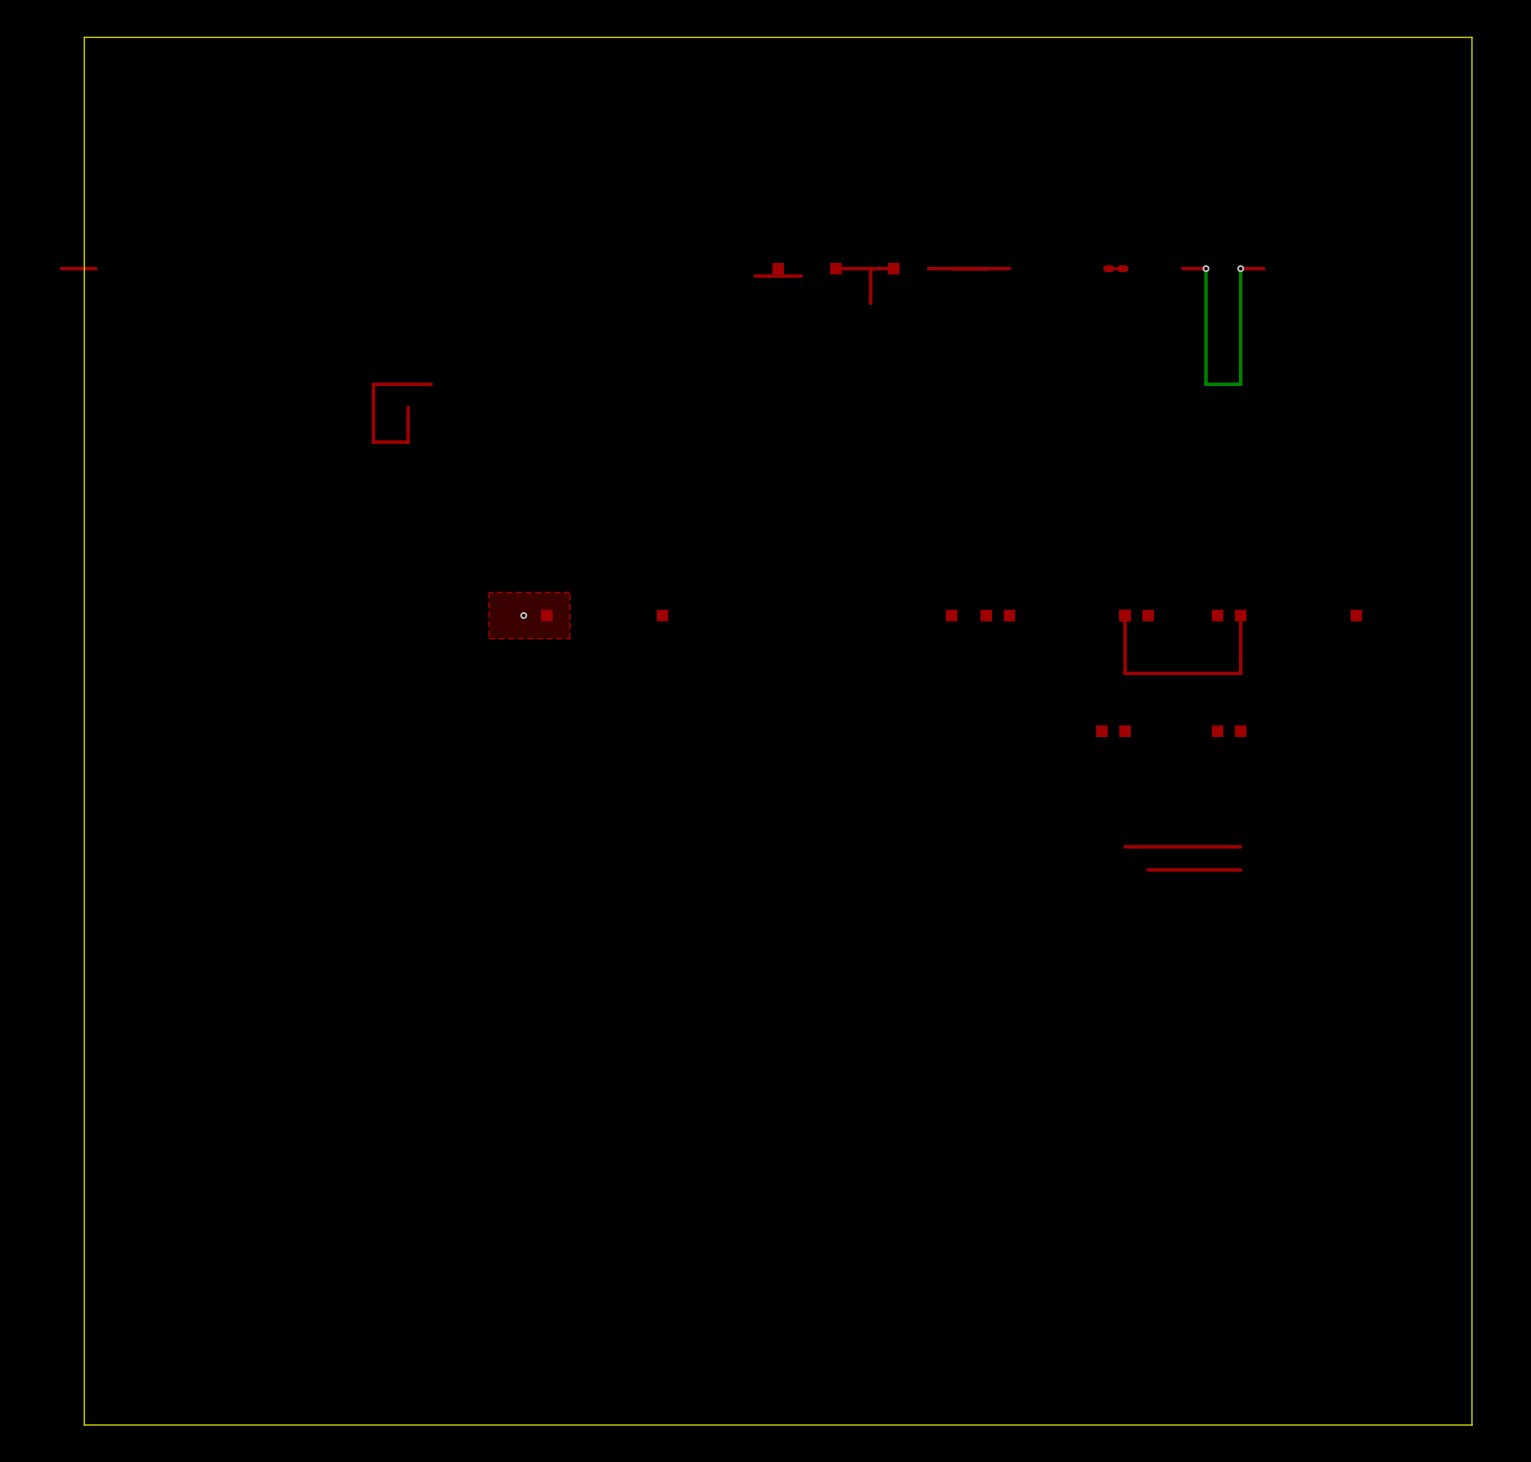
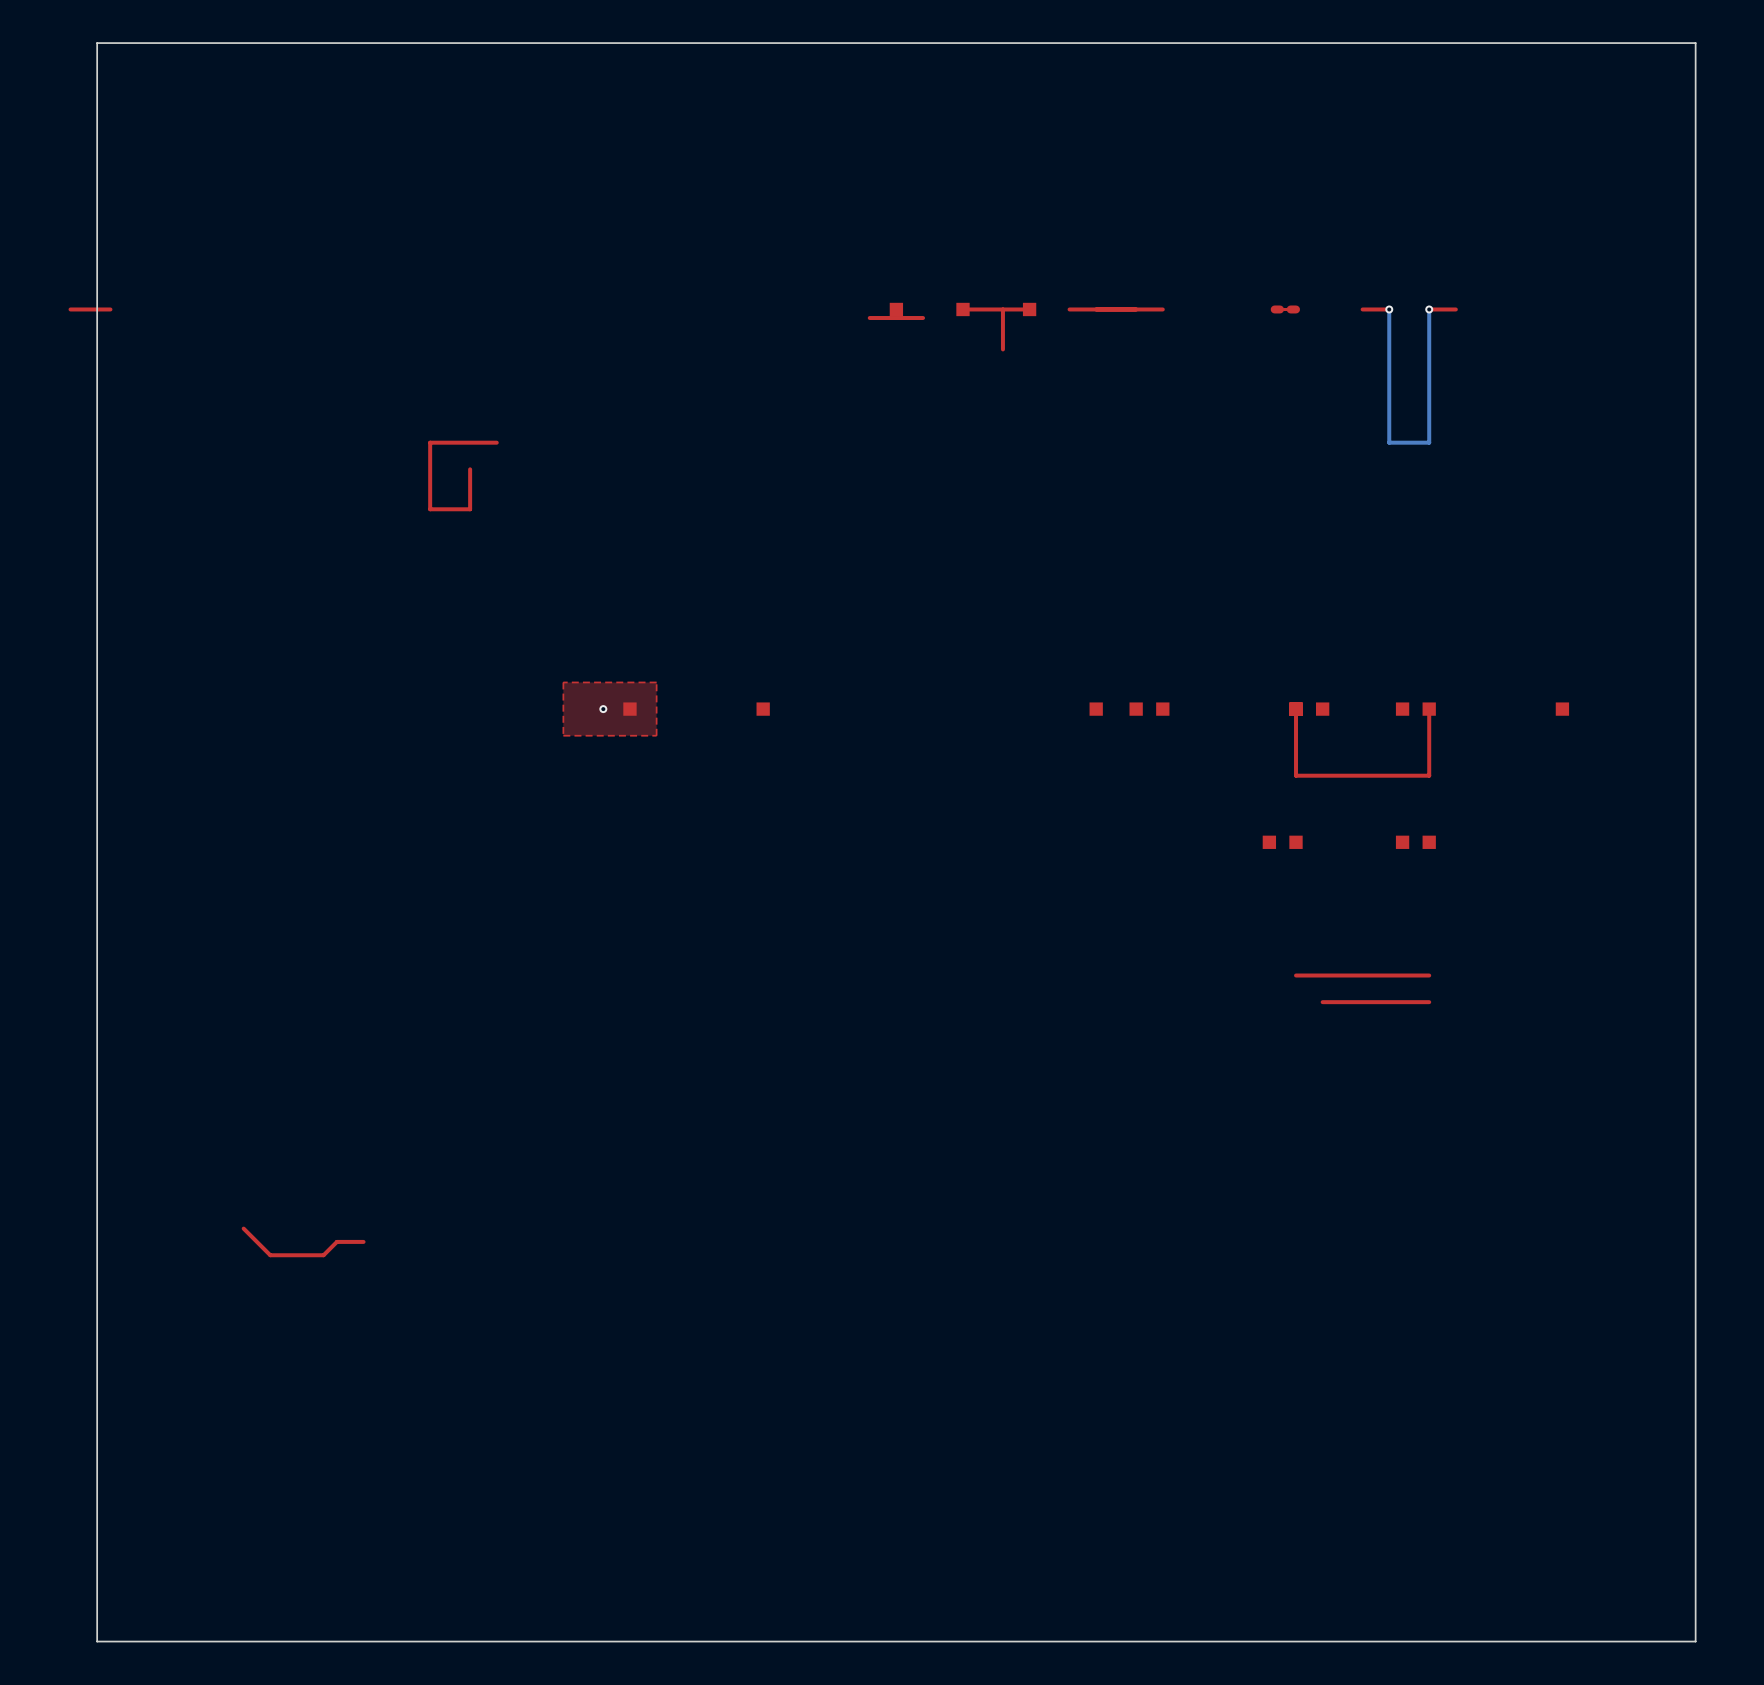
top track: none -> (243, 1228) (270, 1255) (323, 1255) (336, 1241) (363, 1241)

